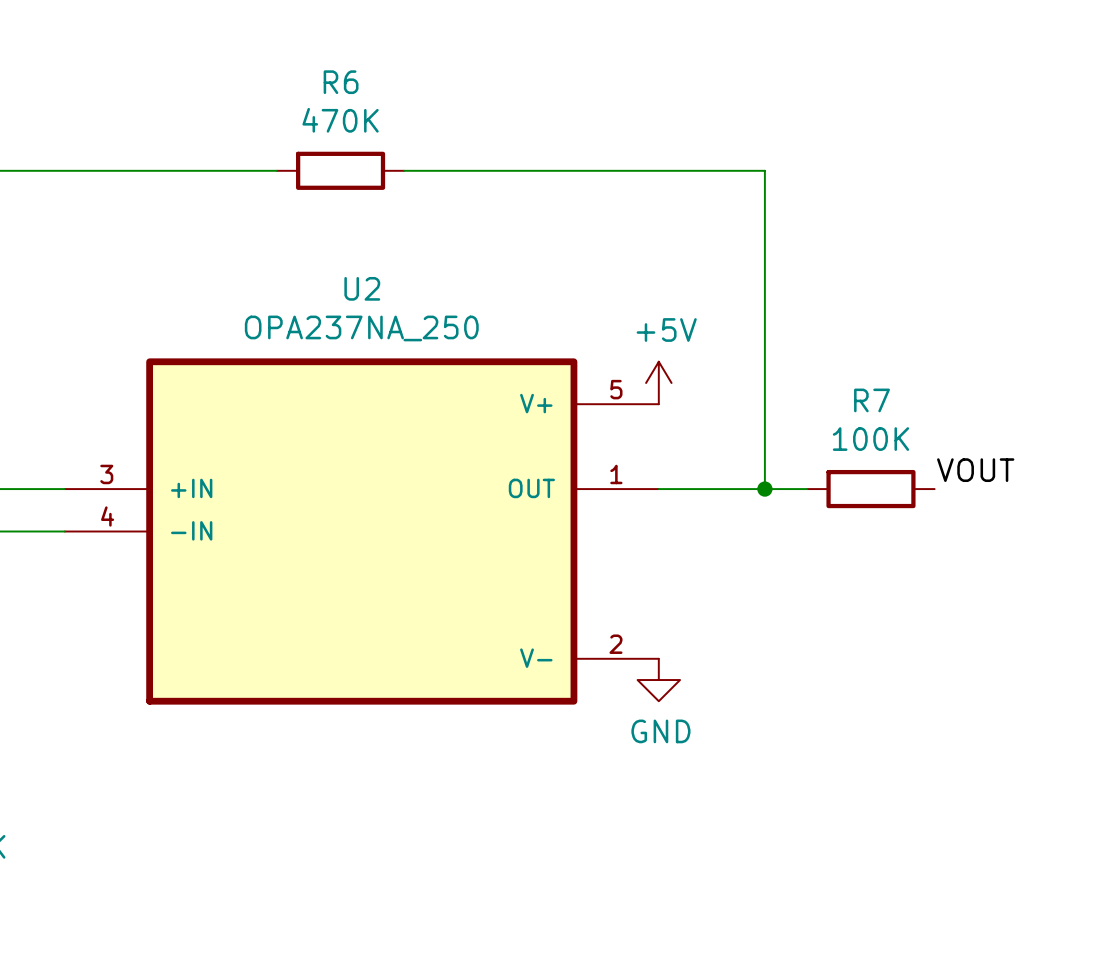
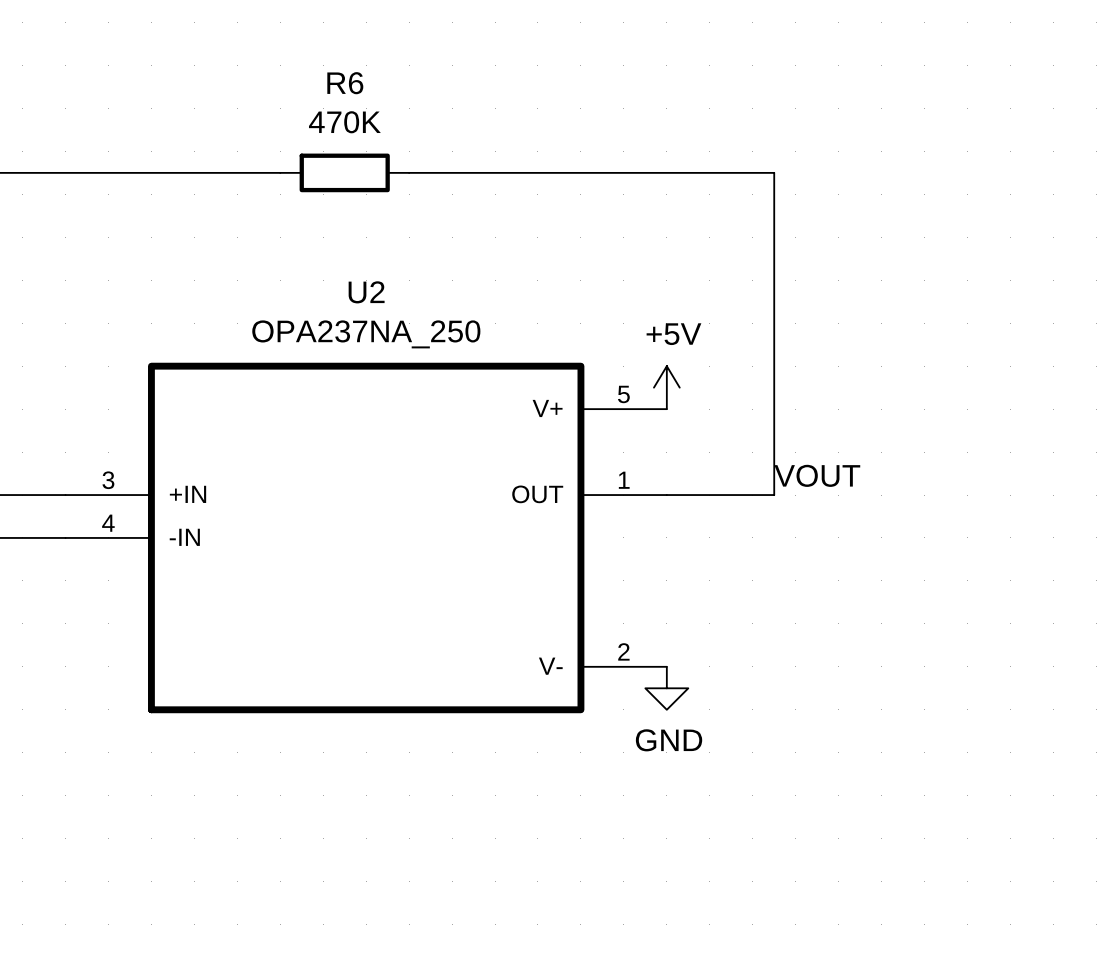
label position: VOUT (975, 470) -> VOUT (817, 475)
wire: (764, 489) (807, 489) -> none
junction: (764, 489) -> none
R7: 100K (870, 489) -> none

